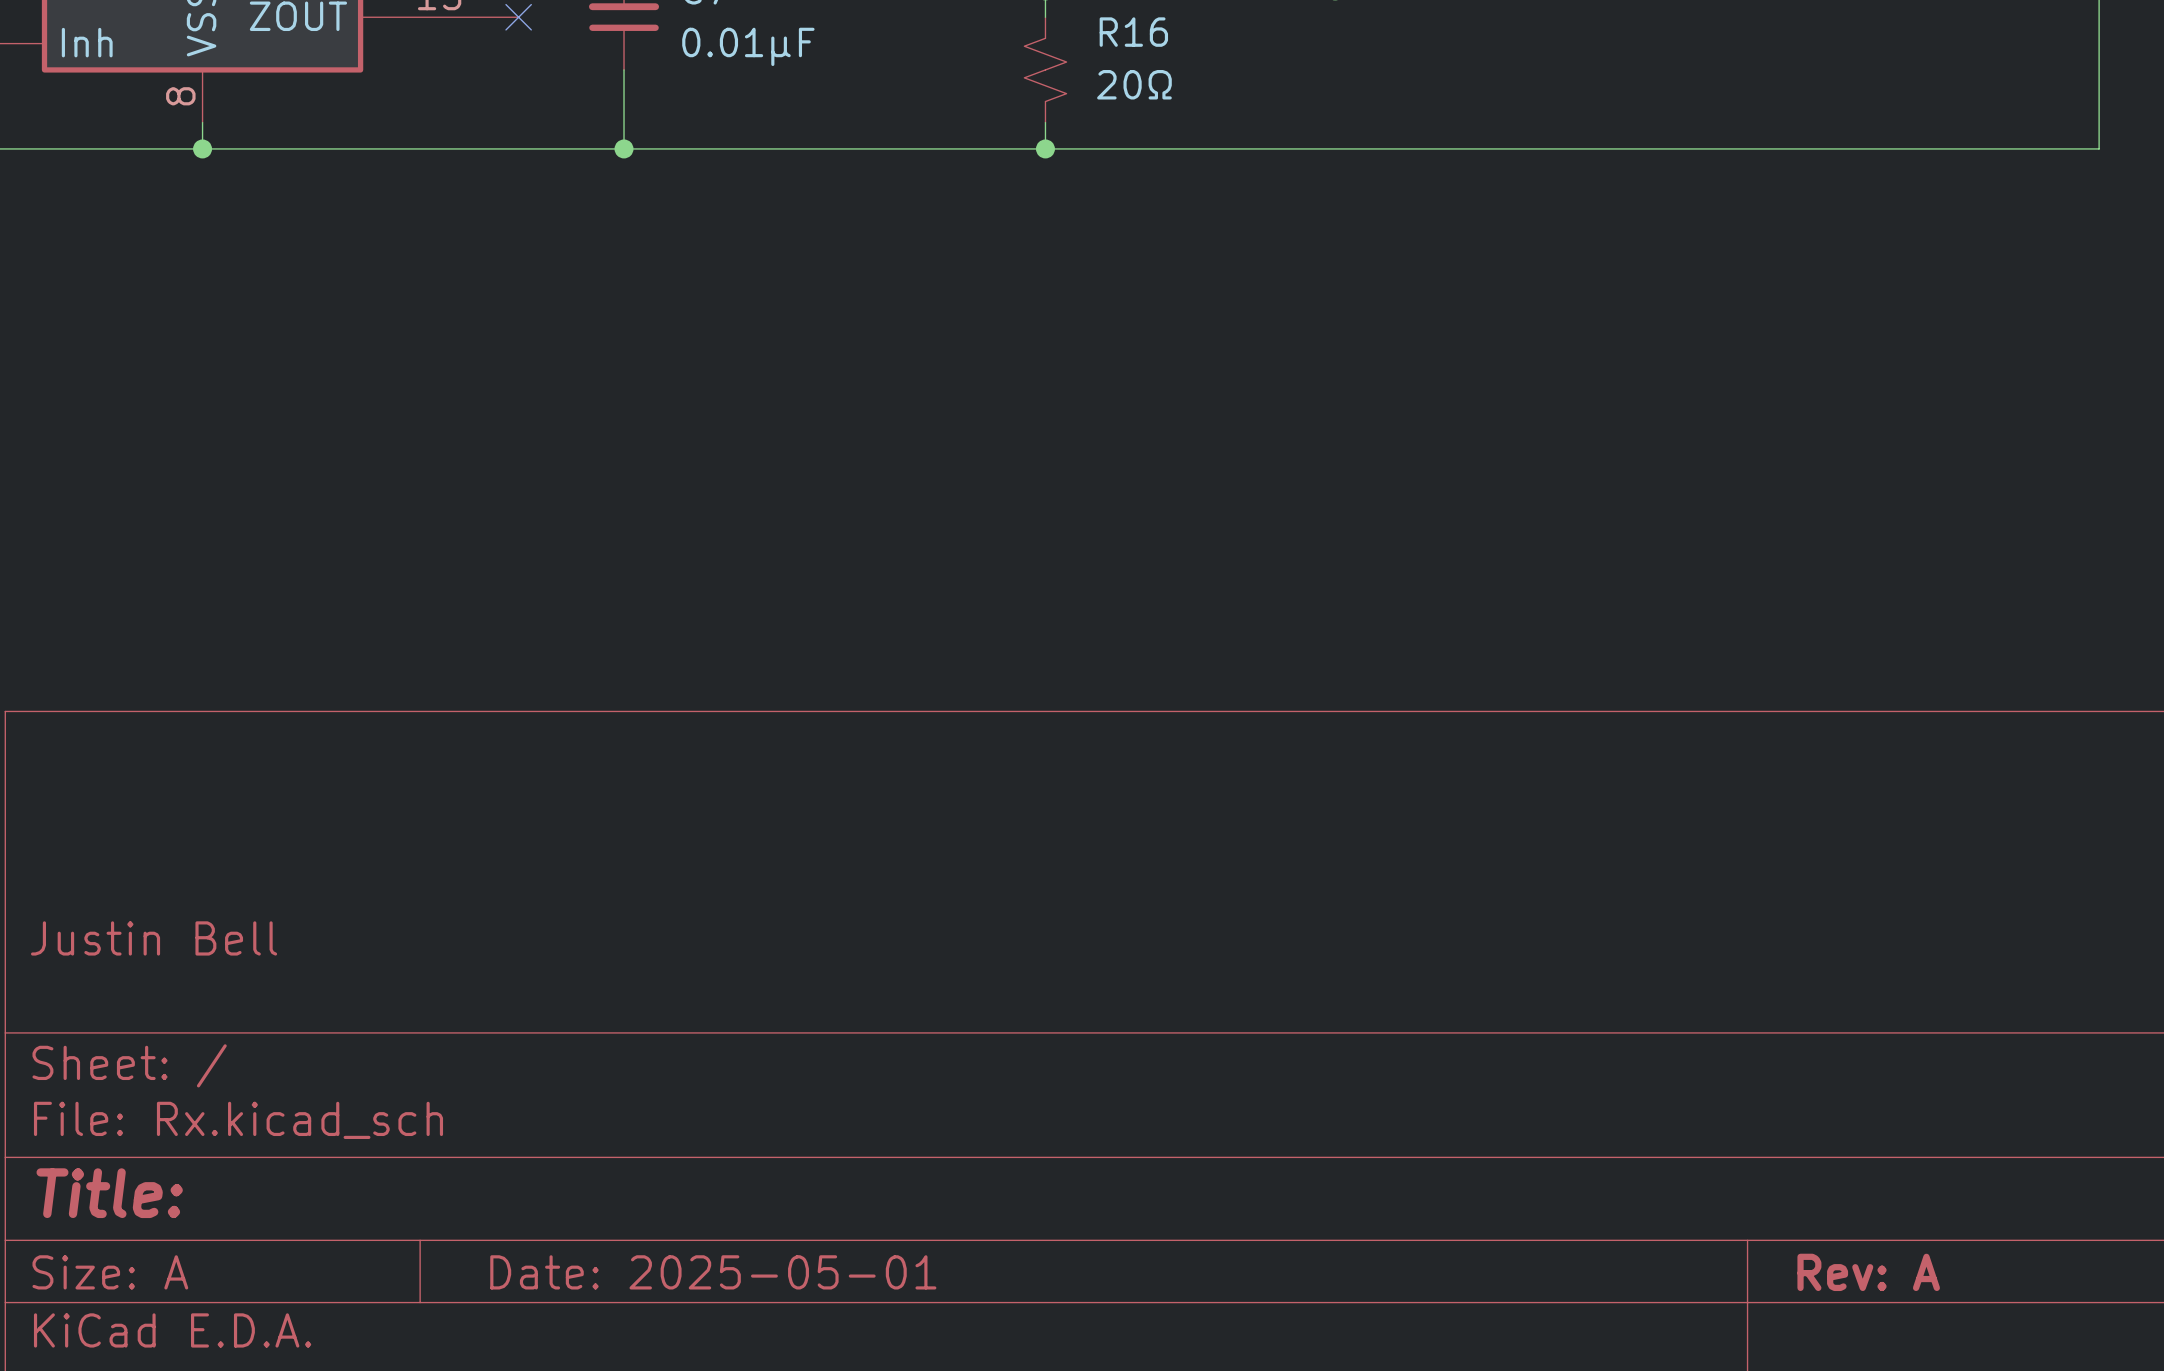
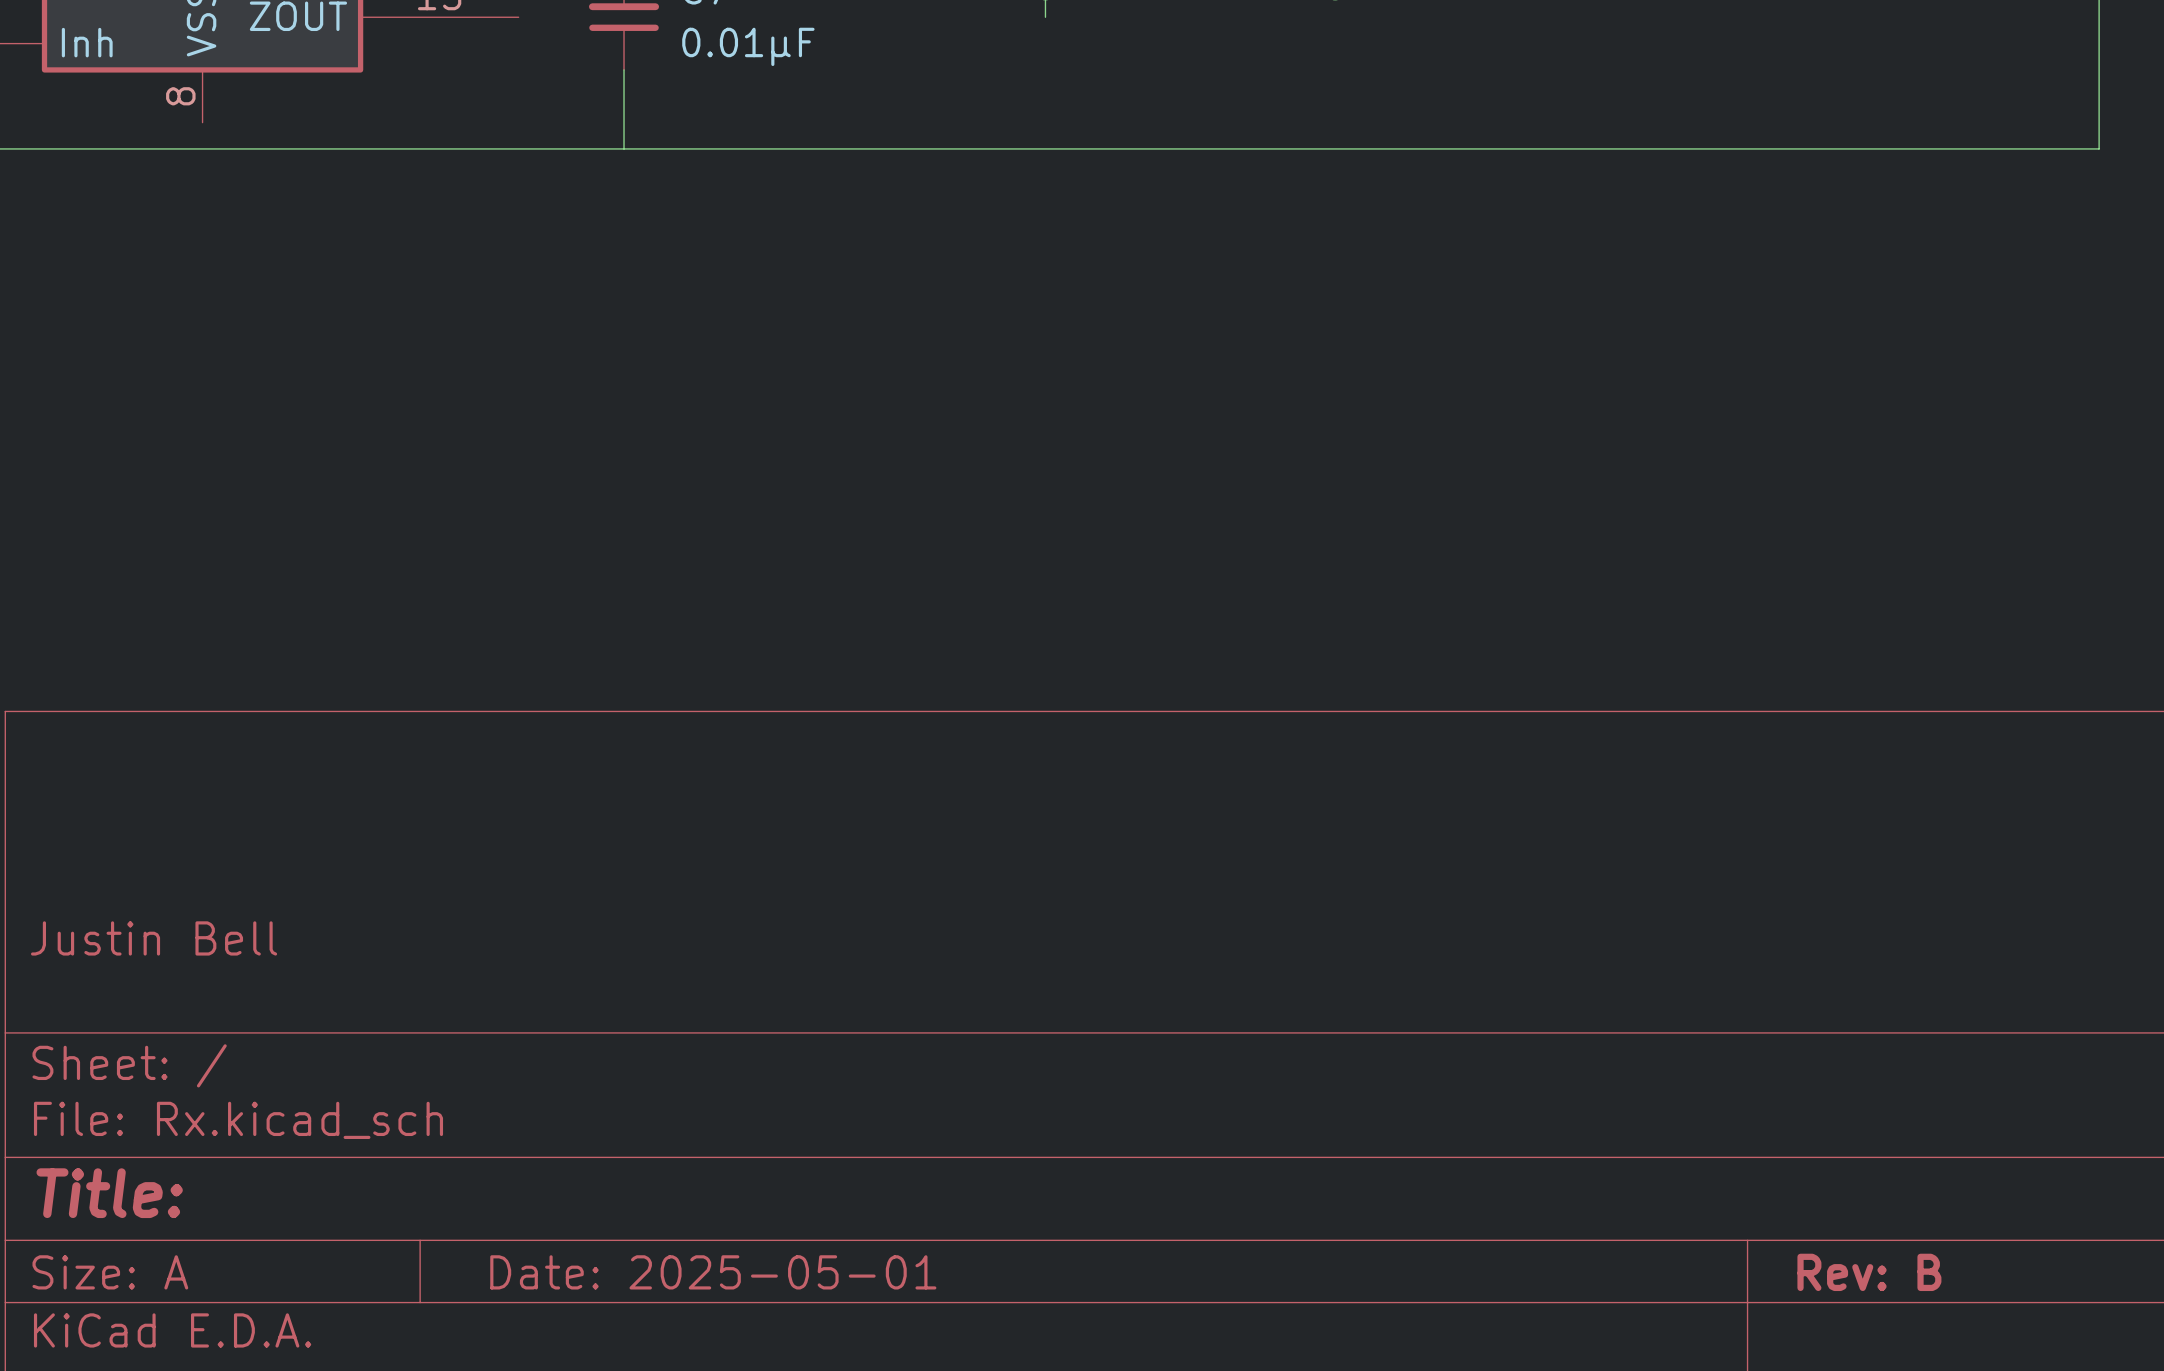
no-connect mark: (518, 17) -> none
R16: 20Ω (1045, 69) -> none
wire: (202, 122) (202, 148) -> none
wire: (1045, 122) (1045, 148) -> none
junction: (202, 148) -> none
junction: (624, 148) -> none
junction: (1045, 148) -> none
title block: Rev: A (1868, 1272) -> Rev: B (1869, 1272)

